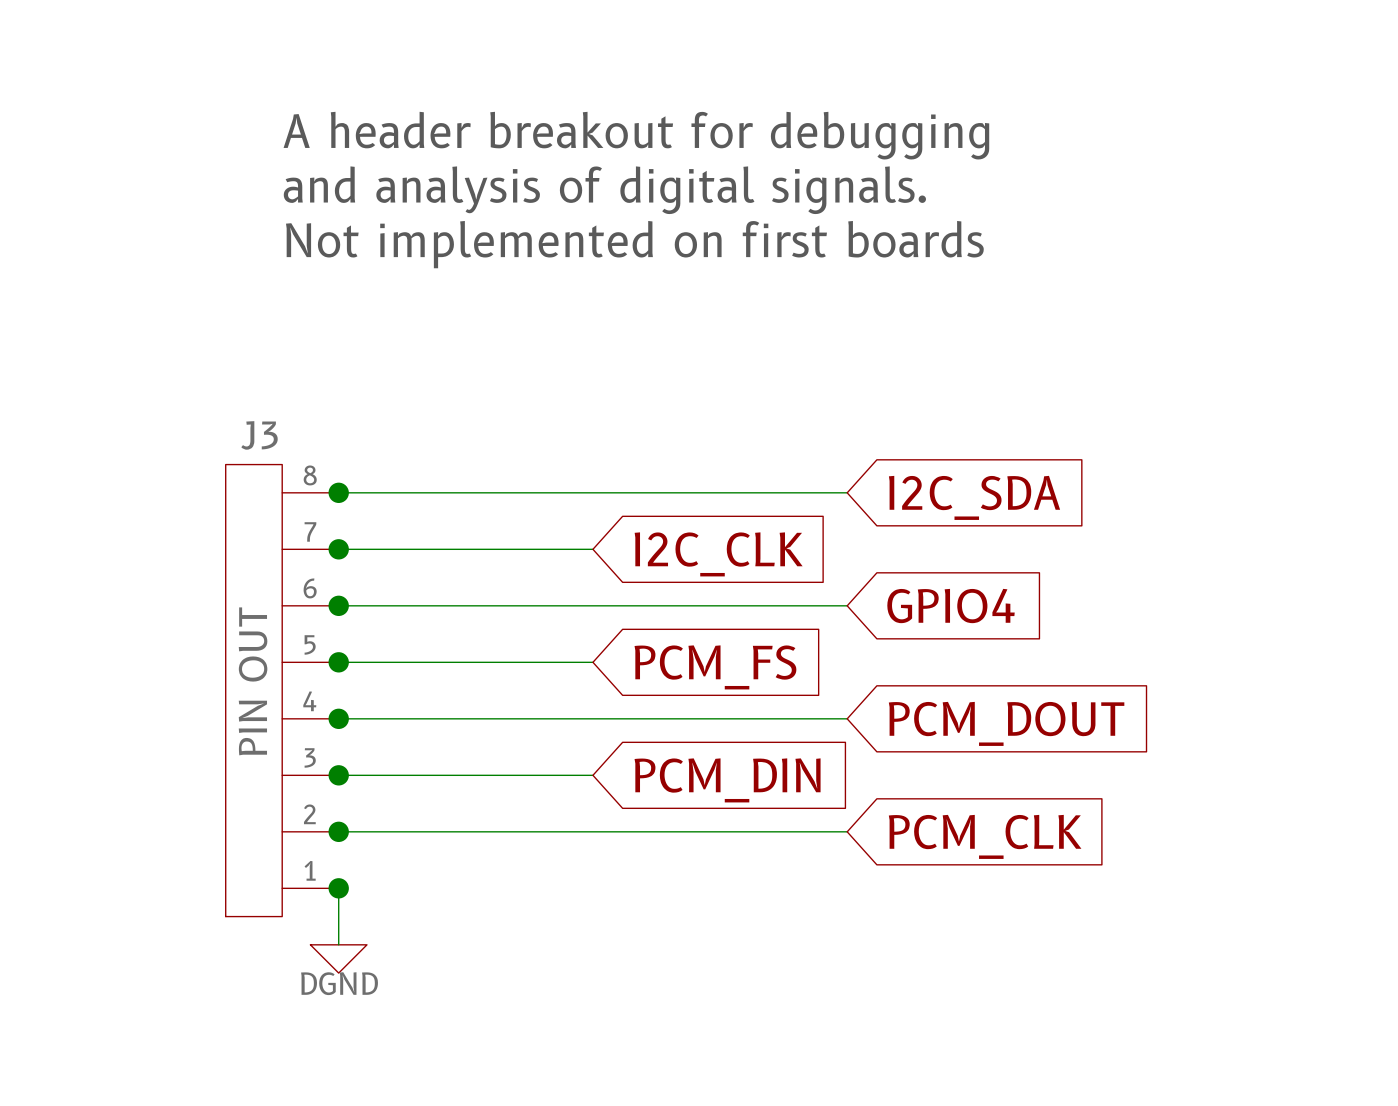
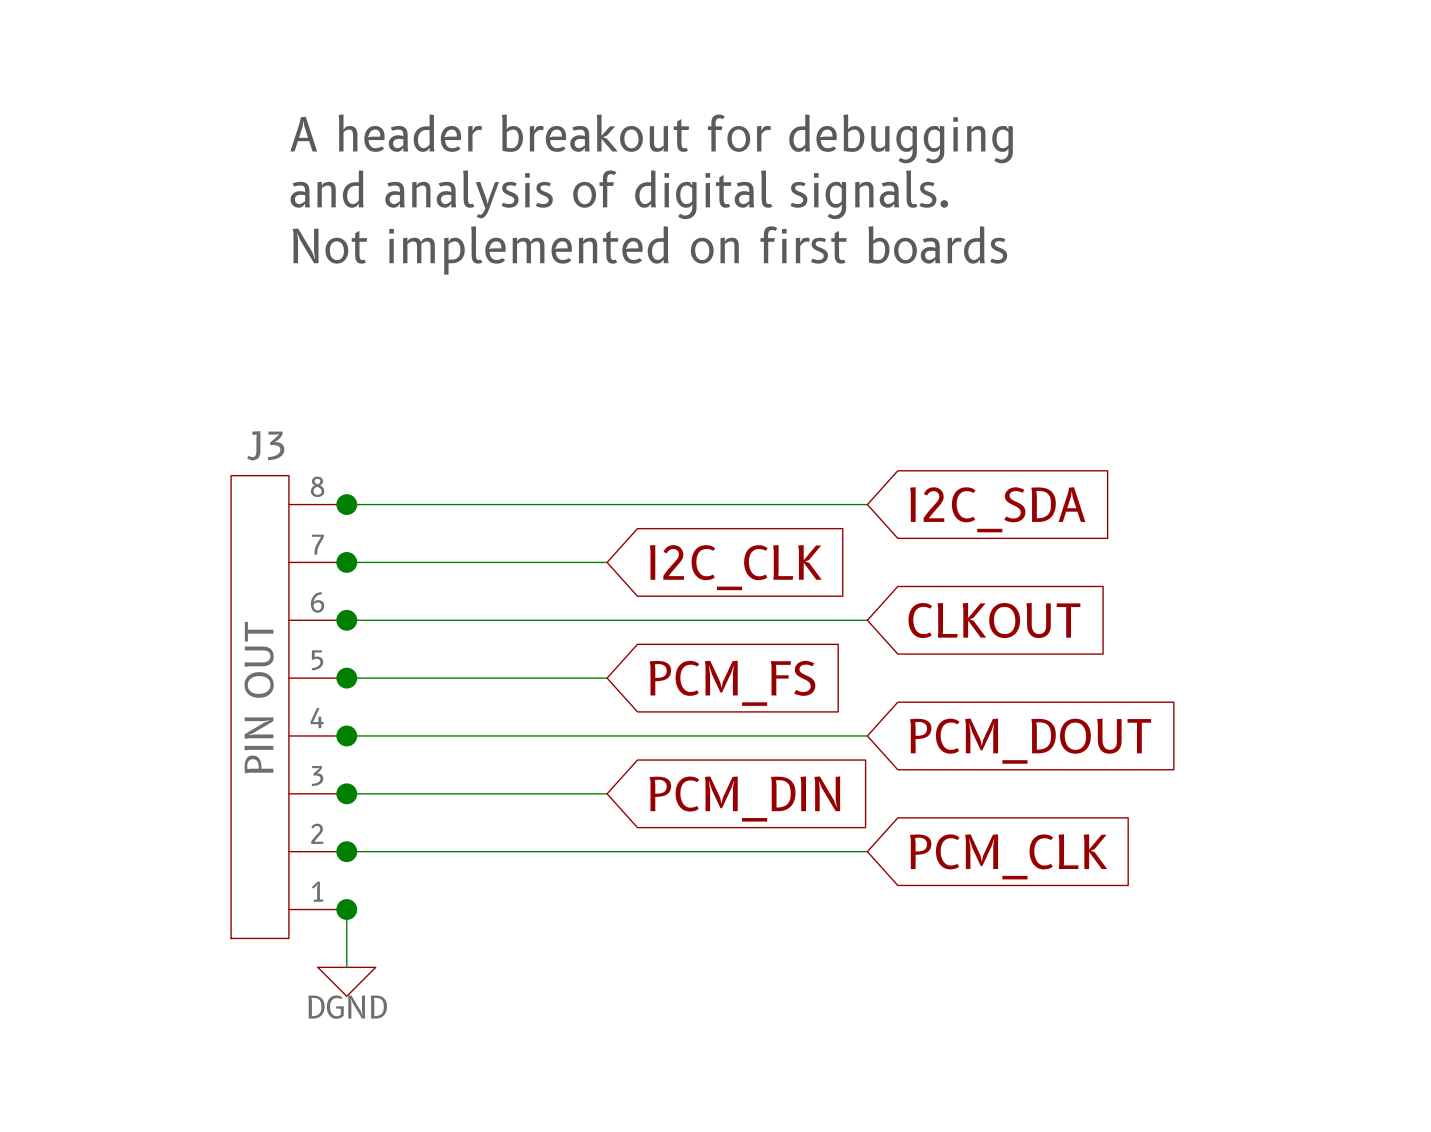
global label: GPIO4 (951, 606) -> CLKOUT (994, 620)

